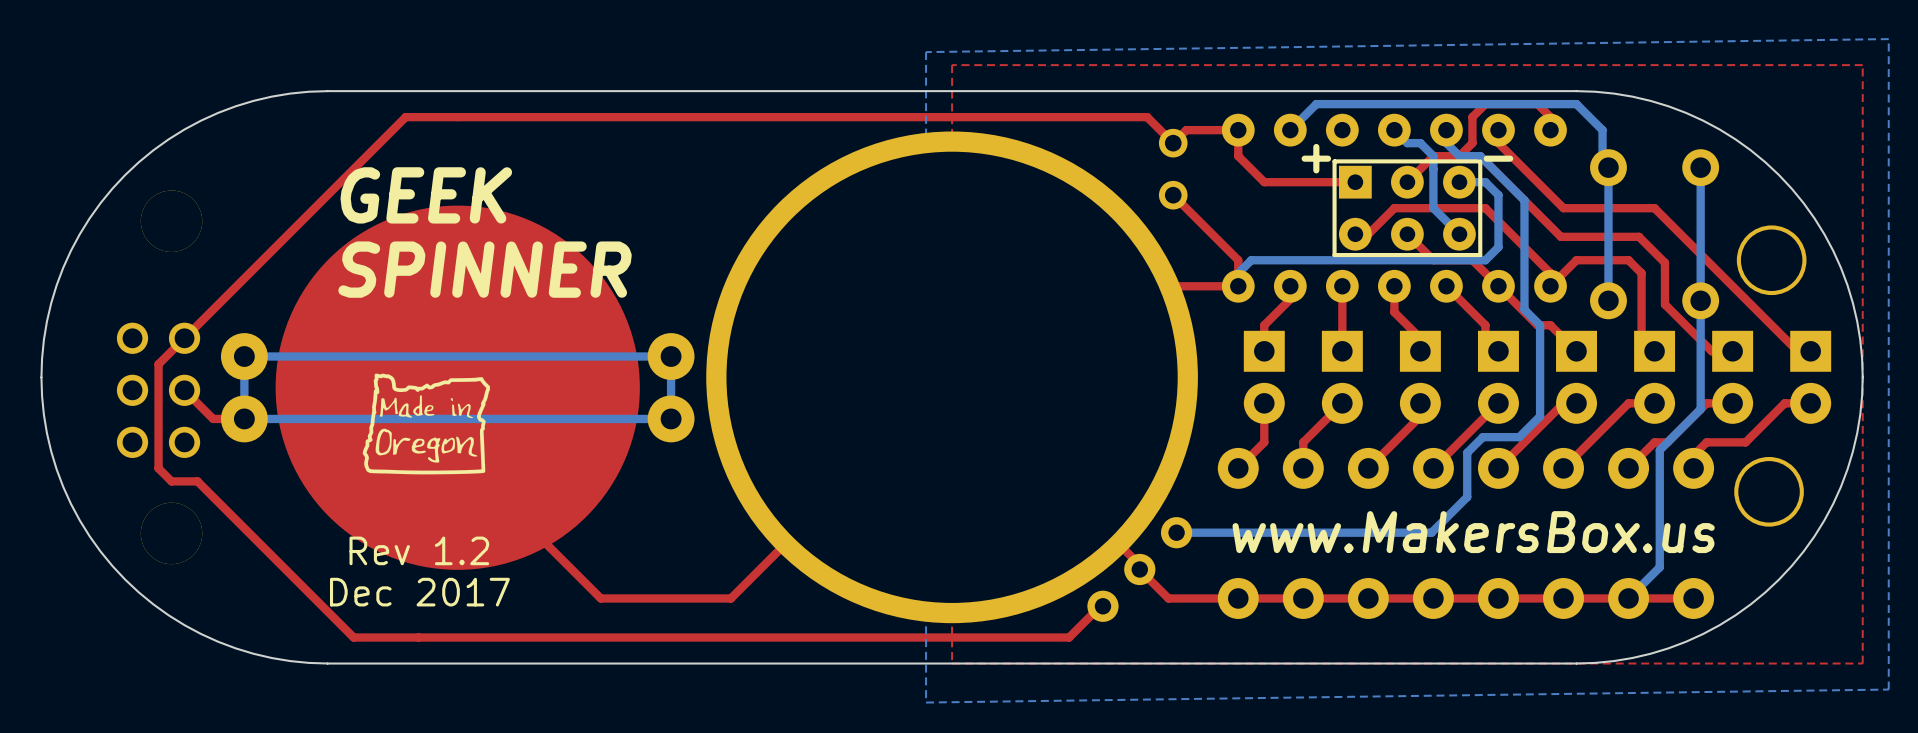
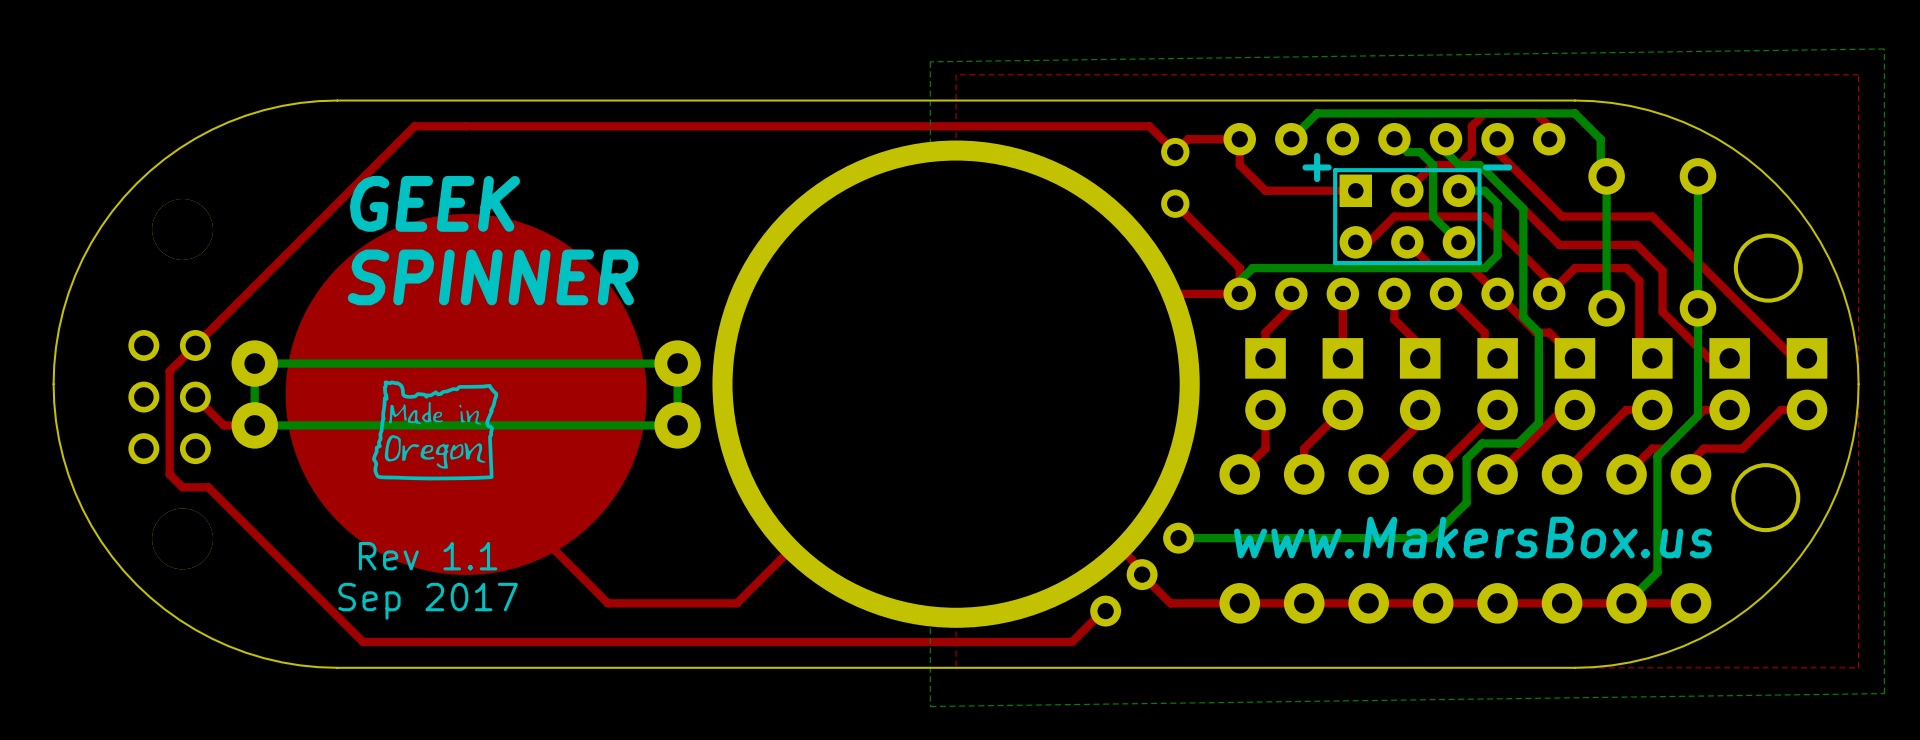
text: Rev 1.2 (419, 550) -> Rev 1.1 (428, 556)
text: Dec 2017 (419, 592) -> Sep 2017 (428, 601)

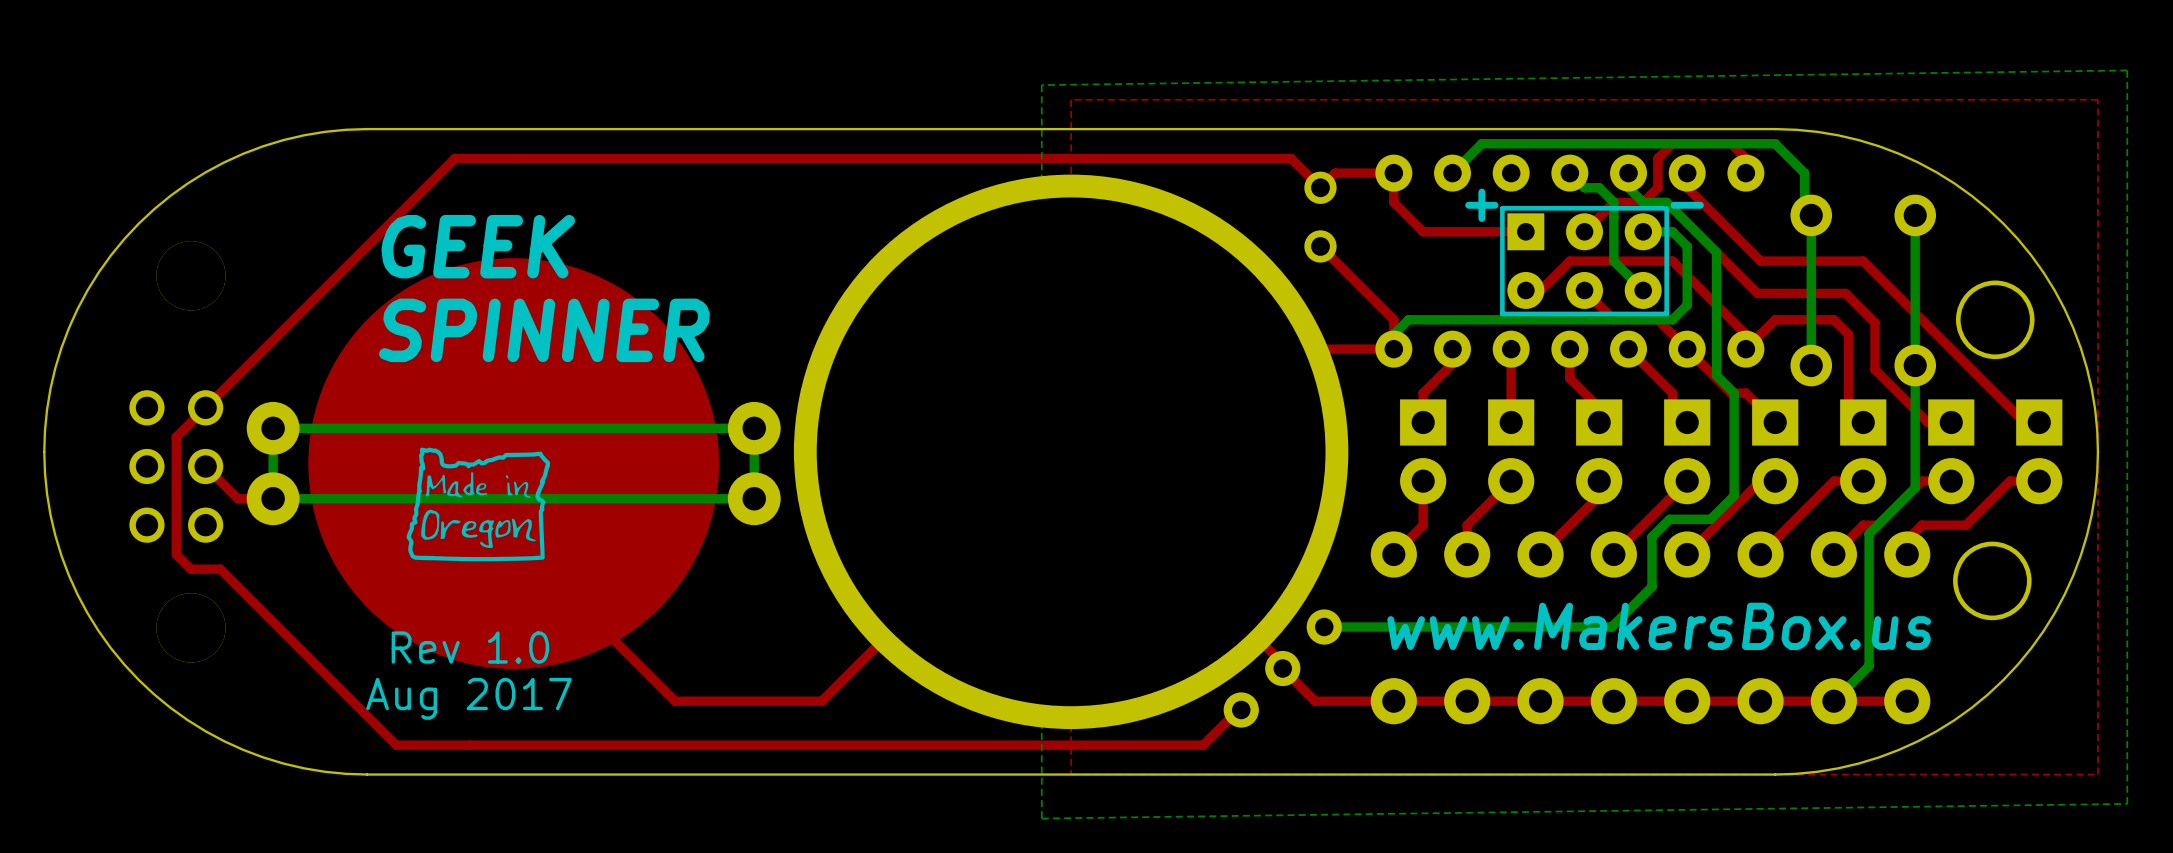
text: Rev 1.1 (428, 556) -> Rev 1.0 (470, 647)
text: Sep 2017 (428, 601) -> Aug 2017 (468, 698)

